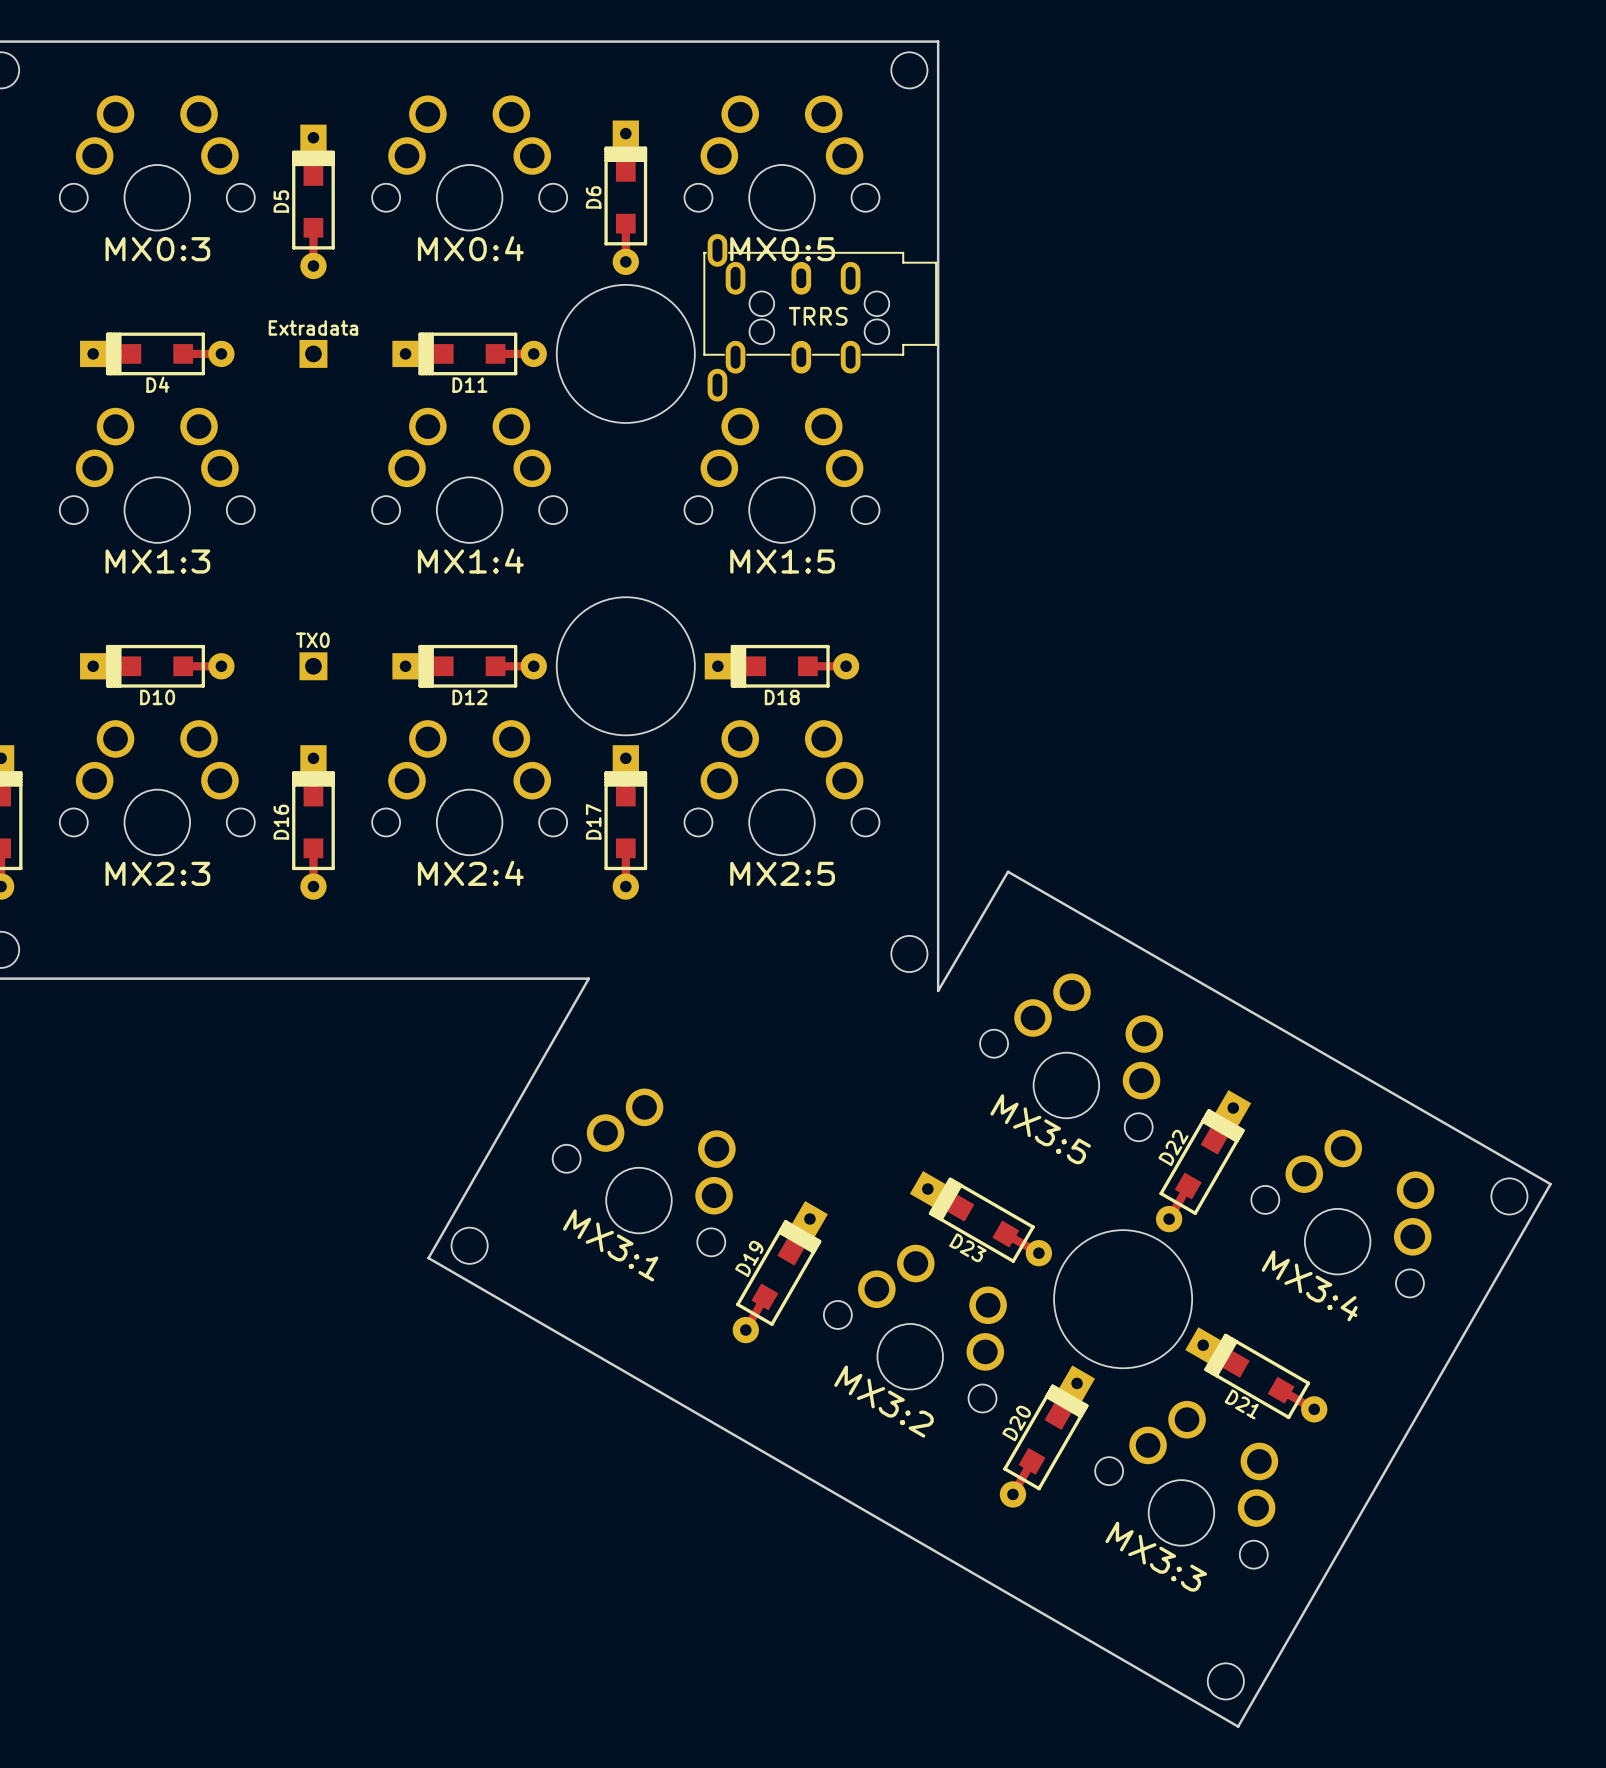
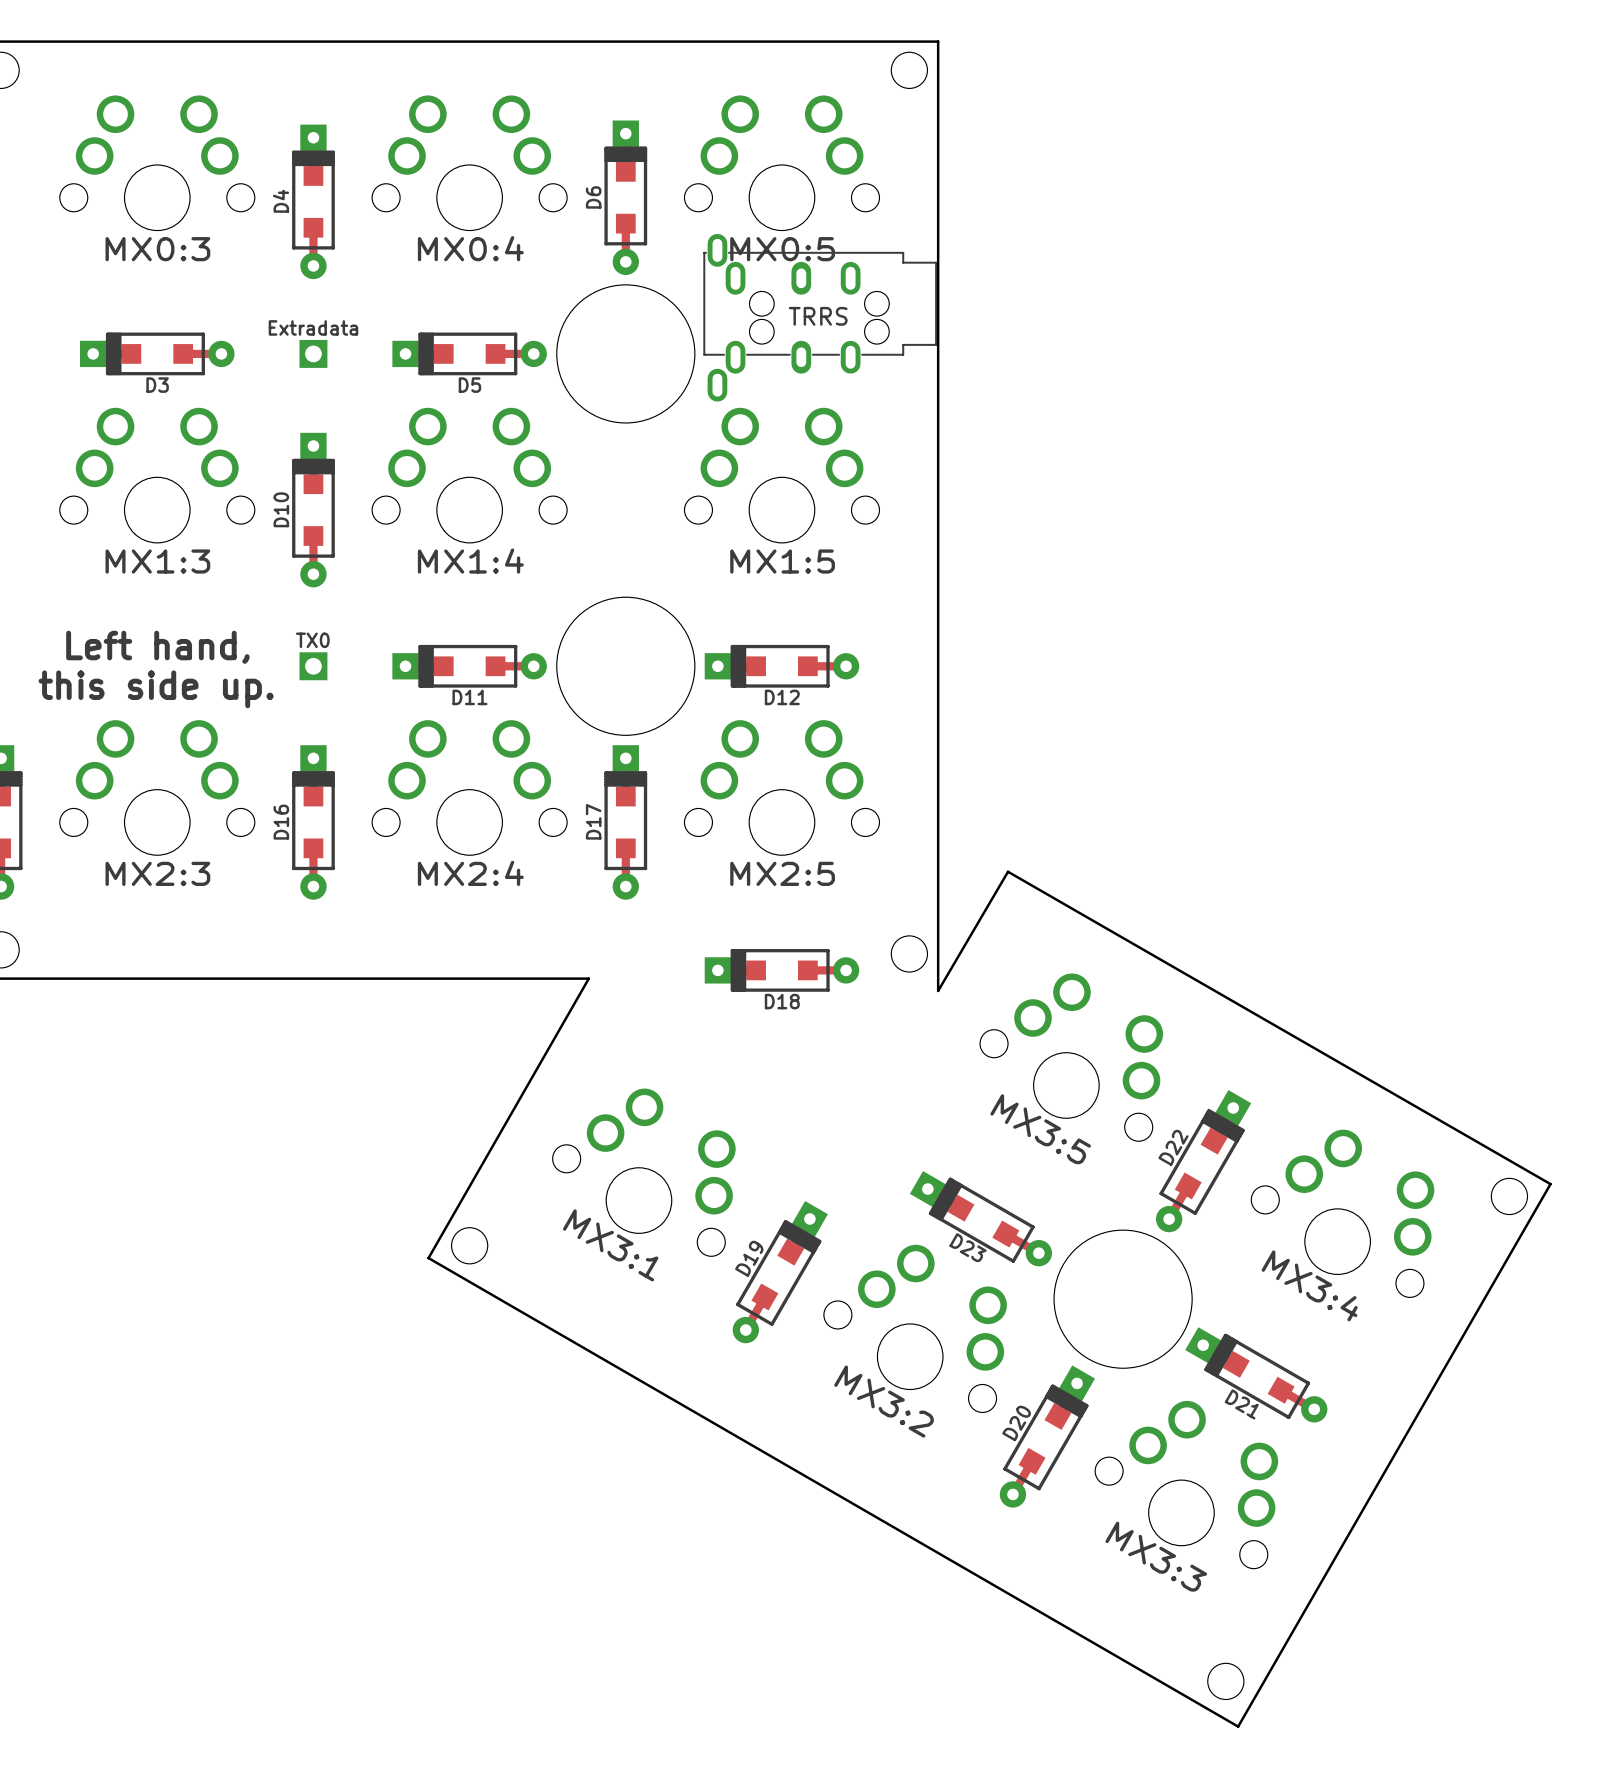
D5 name: D5 (281, 201) -> D4 (281, 201)
D4 name: D4 (157, 384) -> D3 (157, 385)
D11 name: D11 (469, 385) -> D5 (469, 385)
text: none -> Left hand, (157, 647)
D10 rotation: 0° (157, 666) -> 90° clockwise (313, 510)
D10 position: (157, 666) -> (313, 510)
text: none -> this side up. (156, 689)
D12 name: D12 (469, 697) -> D11 (469, 697)
D18 name: D18 (782, 697) -> D12 (782, 697)
D18: none -> (781, 970)

